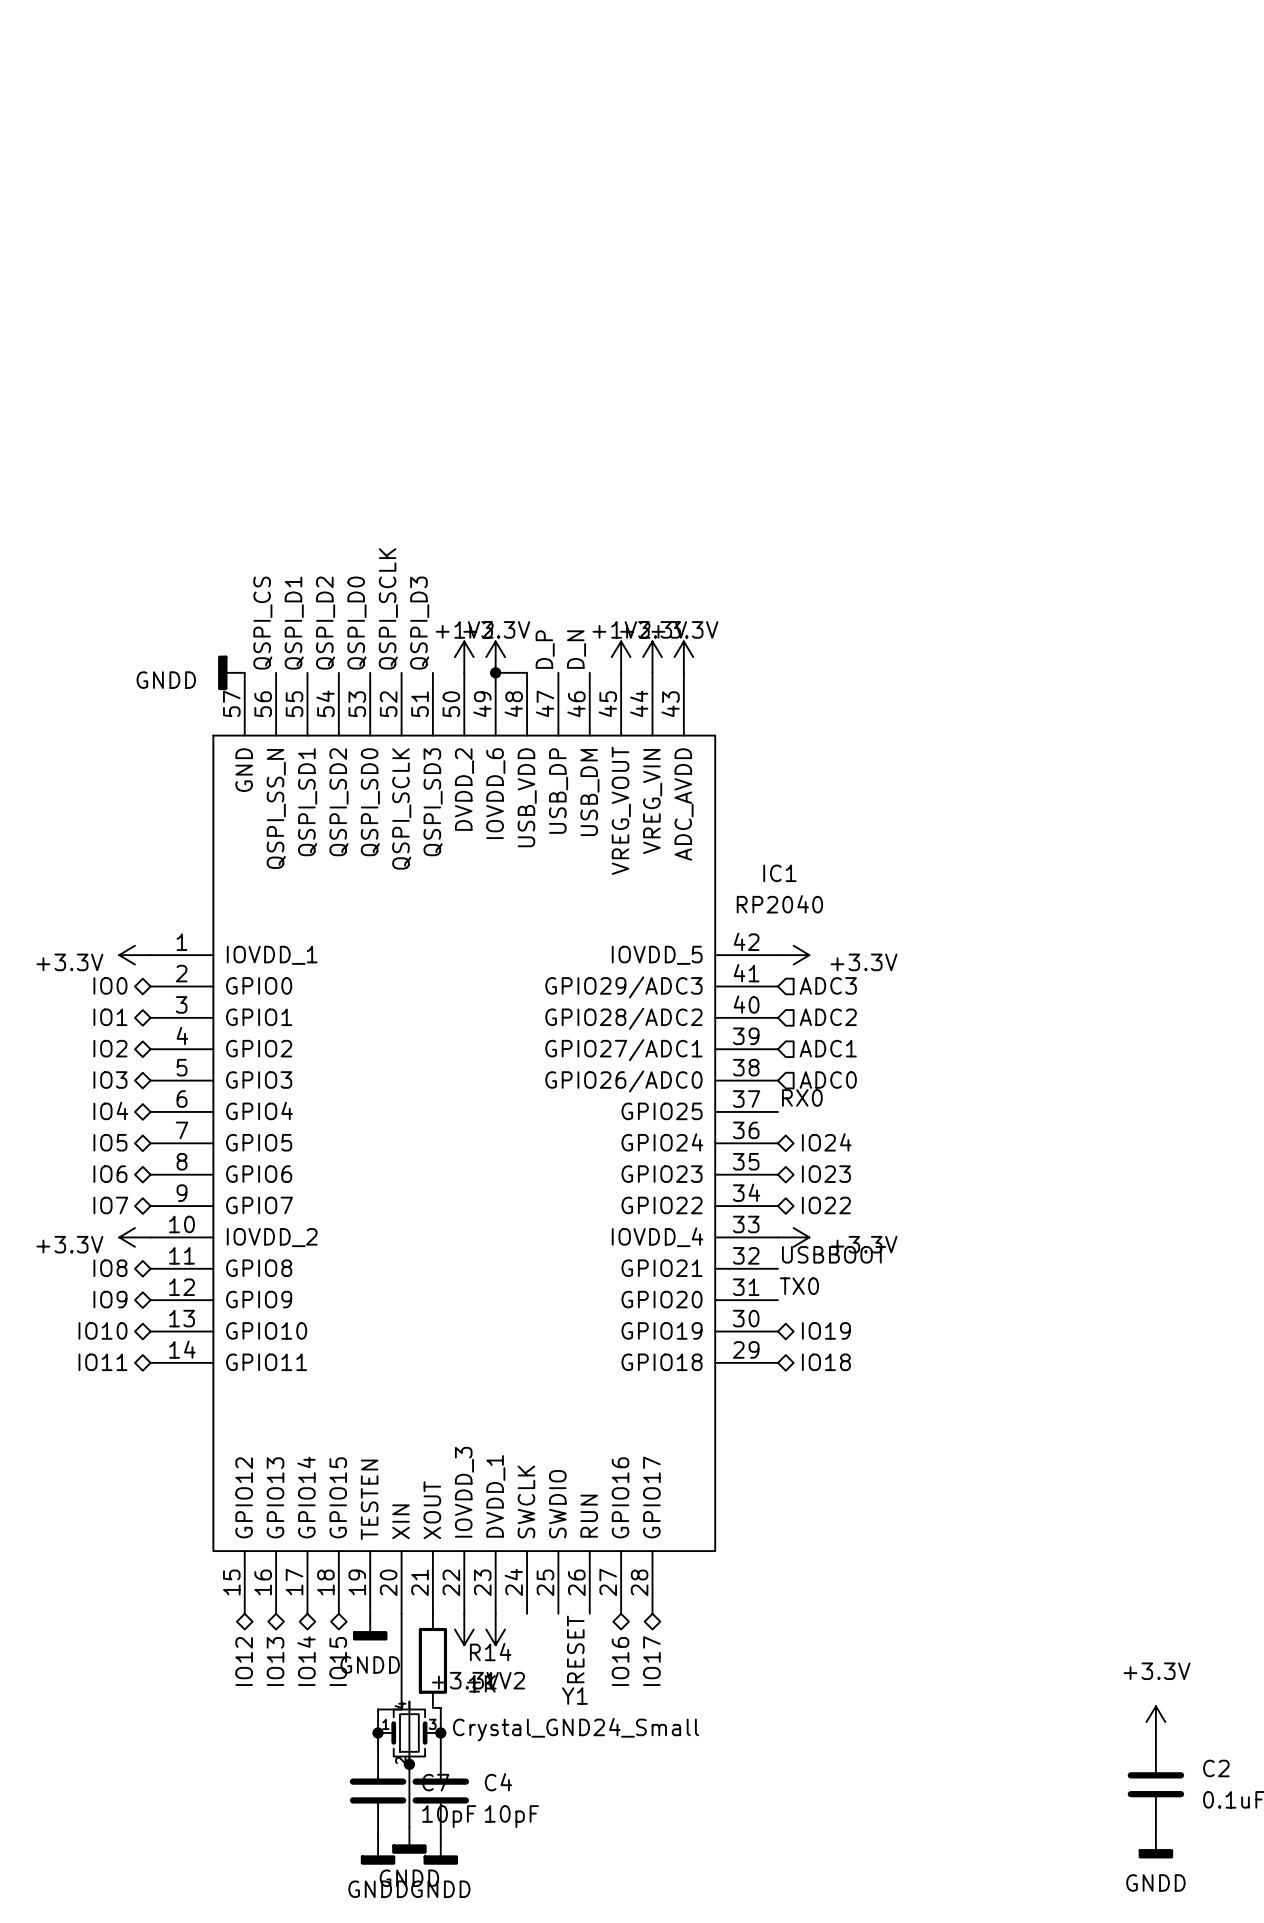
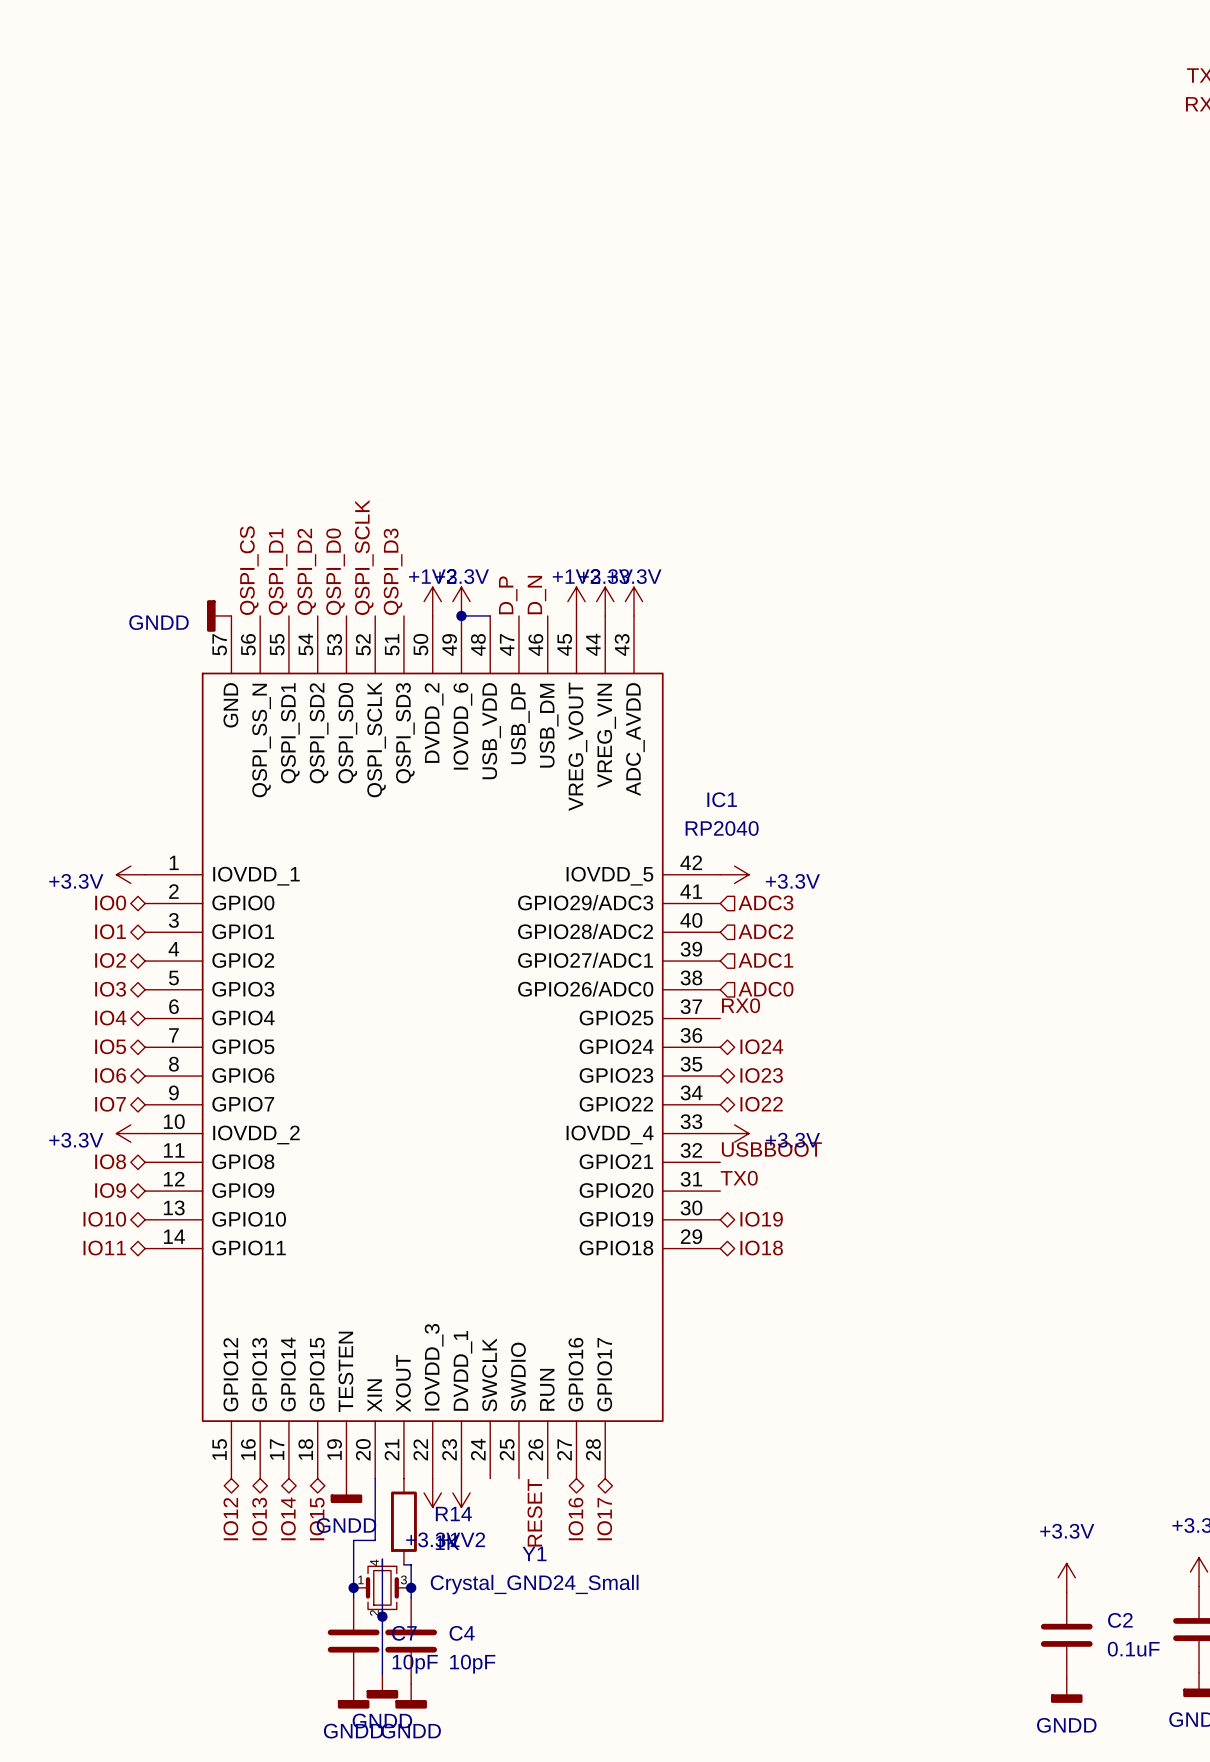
wire: (401, 1681) (401, 1709) (378, 1709) -> (375, 1540) (353, 1540) (353, 1566)

